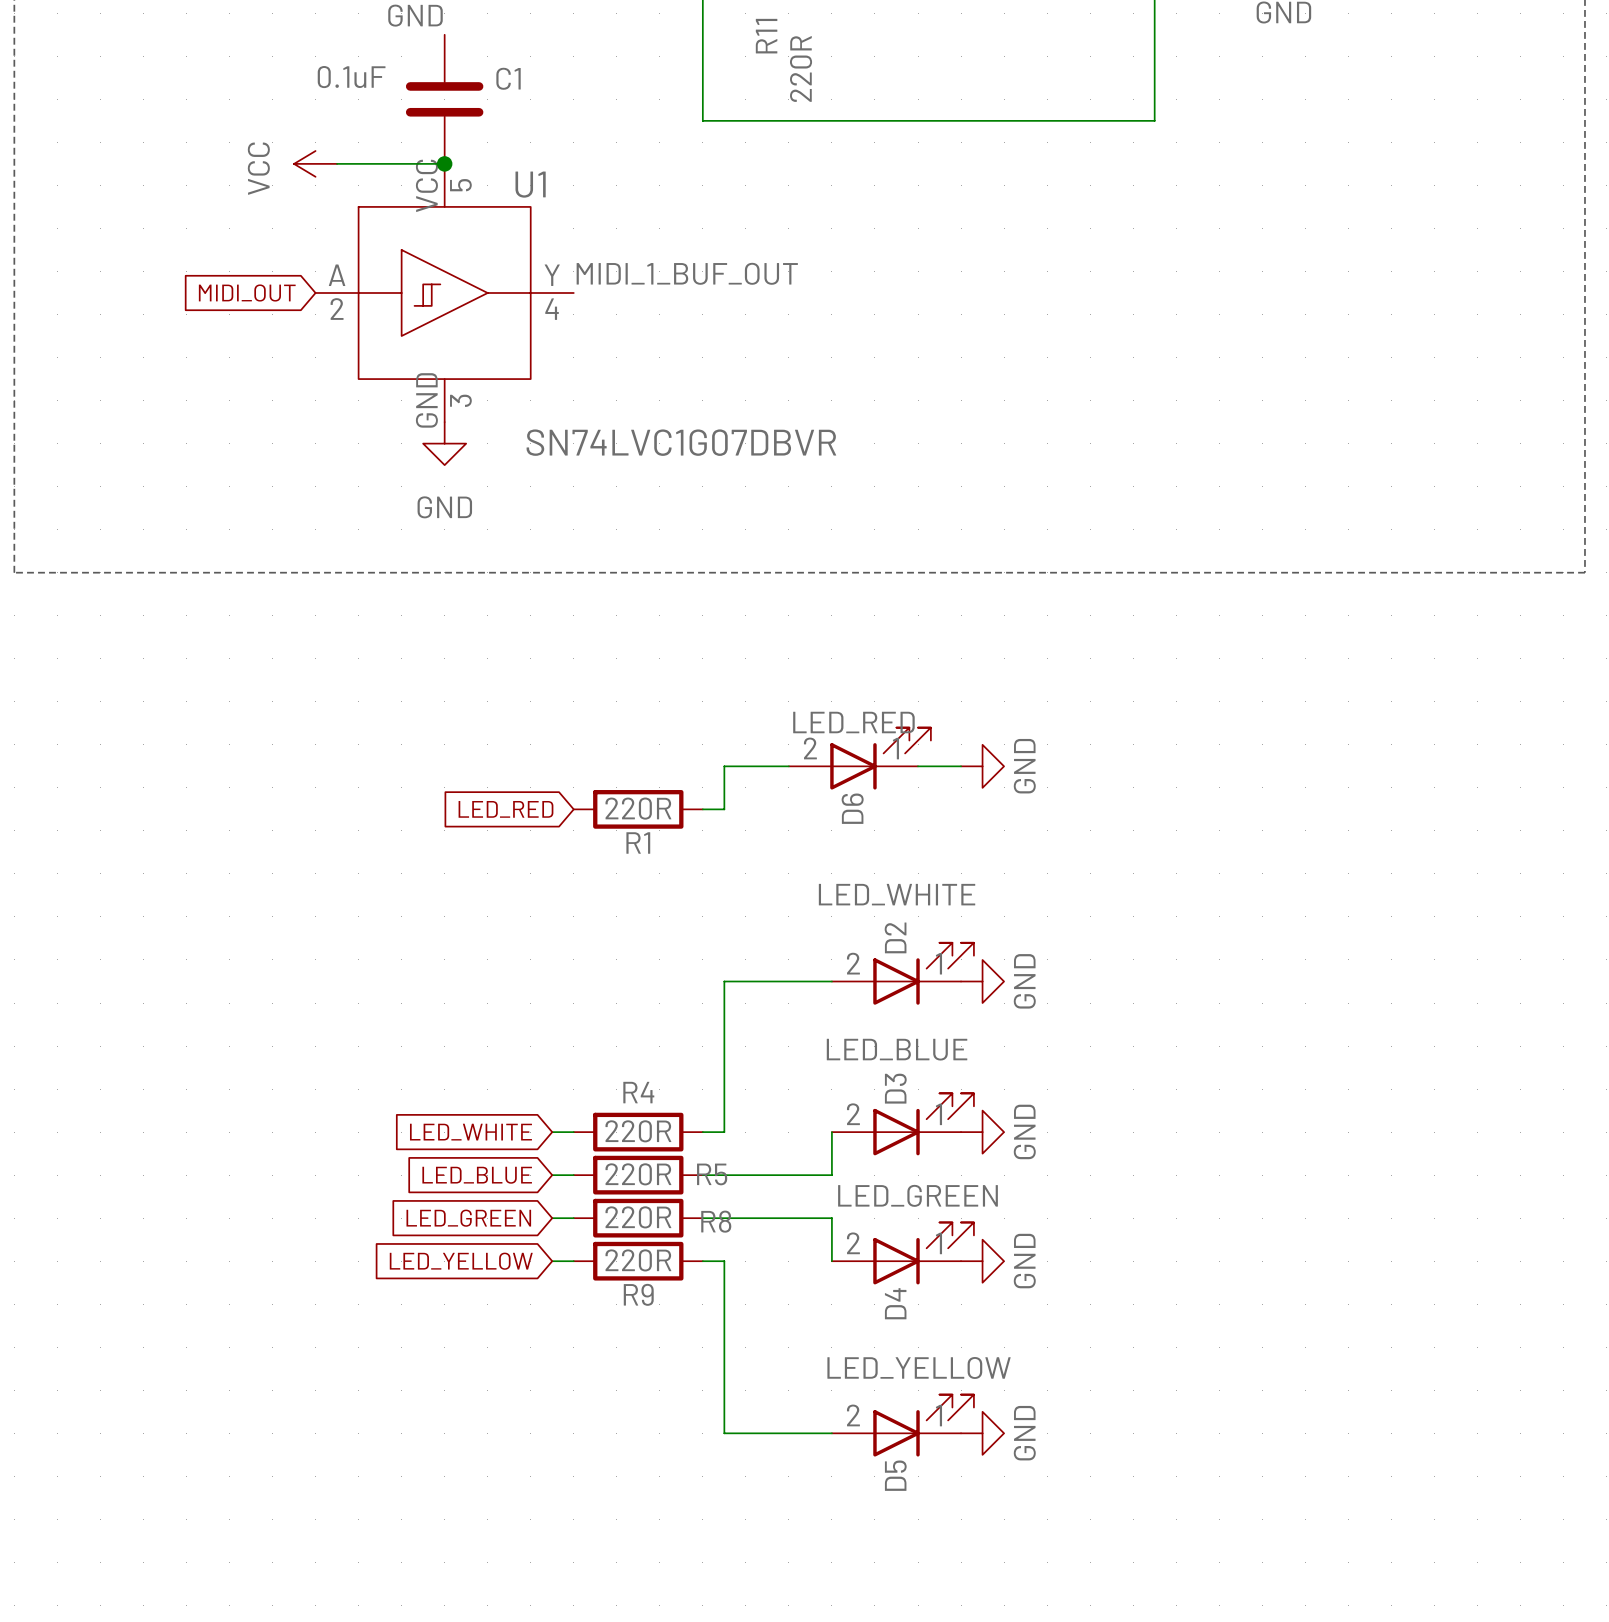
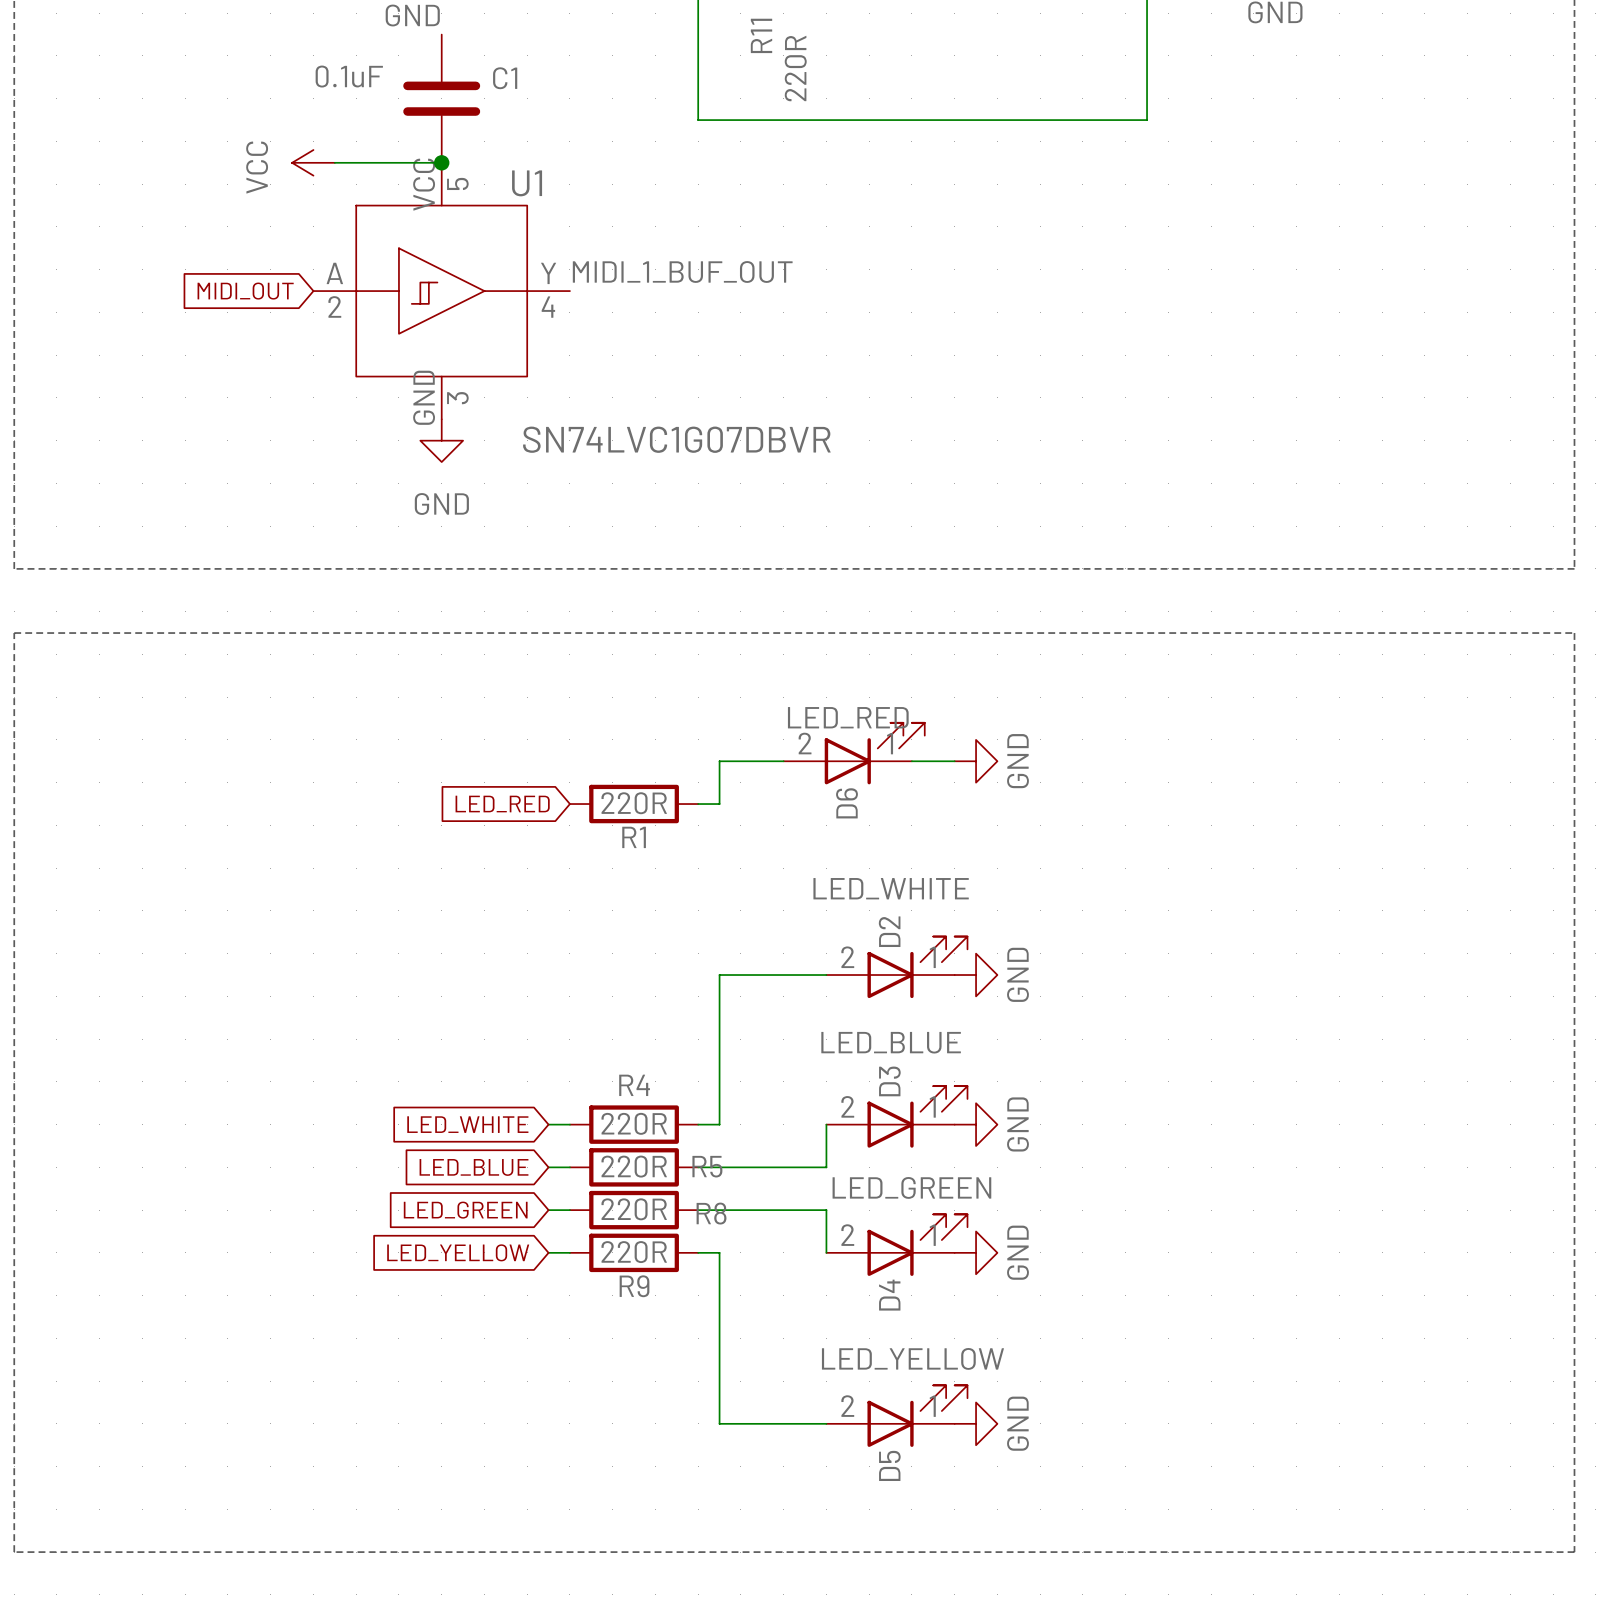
line: none -> (14, 633) (1574, 633) (1574, 1552) (14, 1552) (14, 633)

